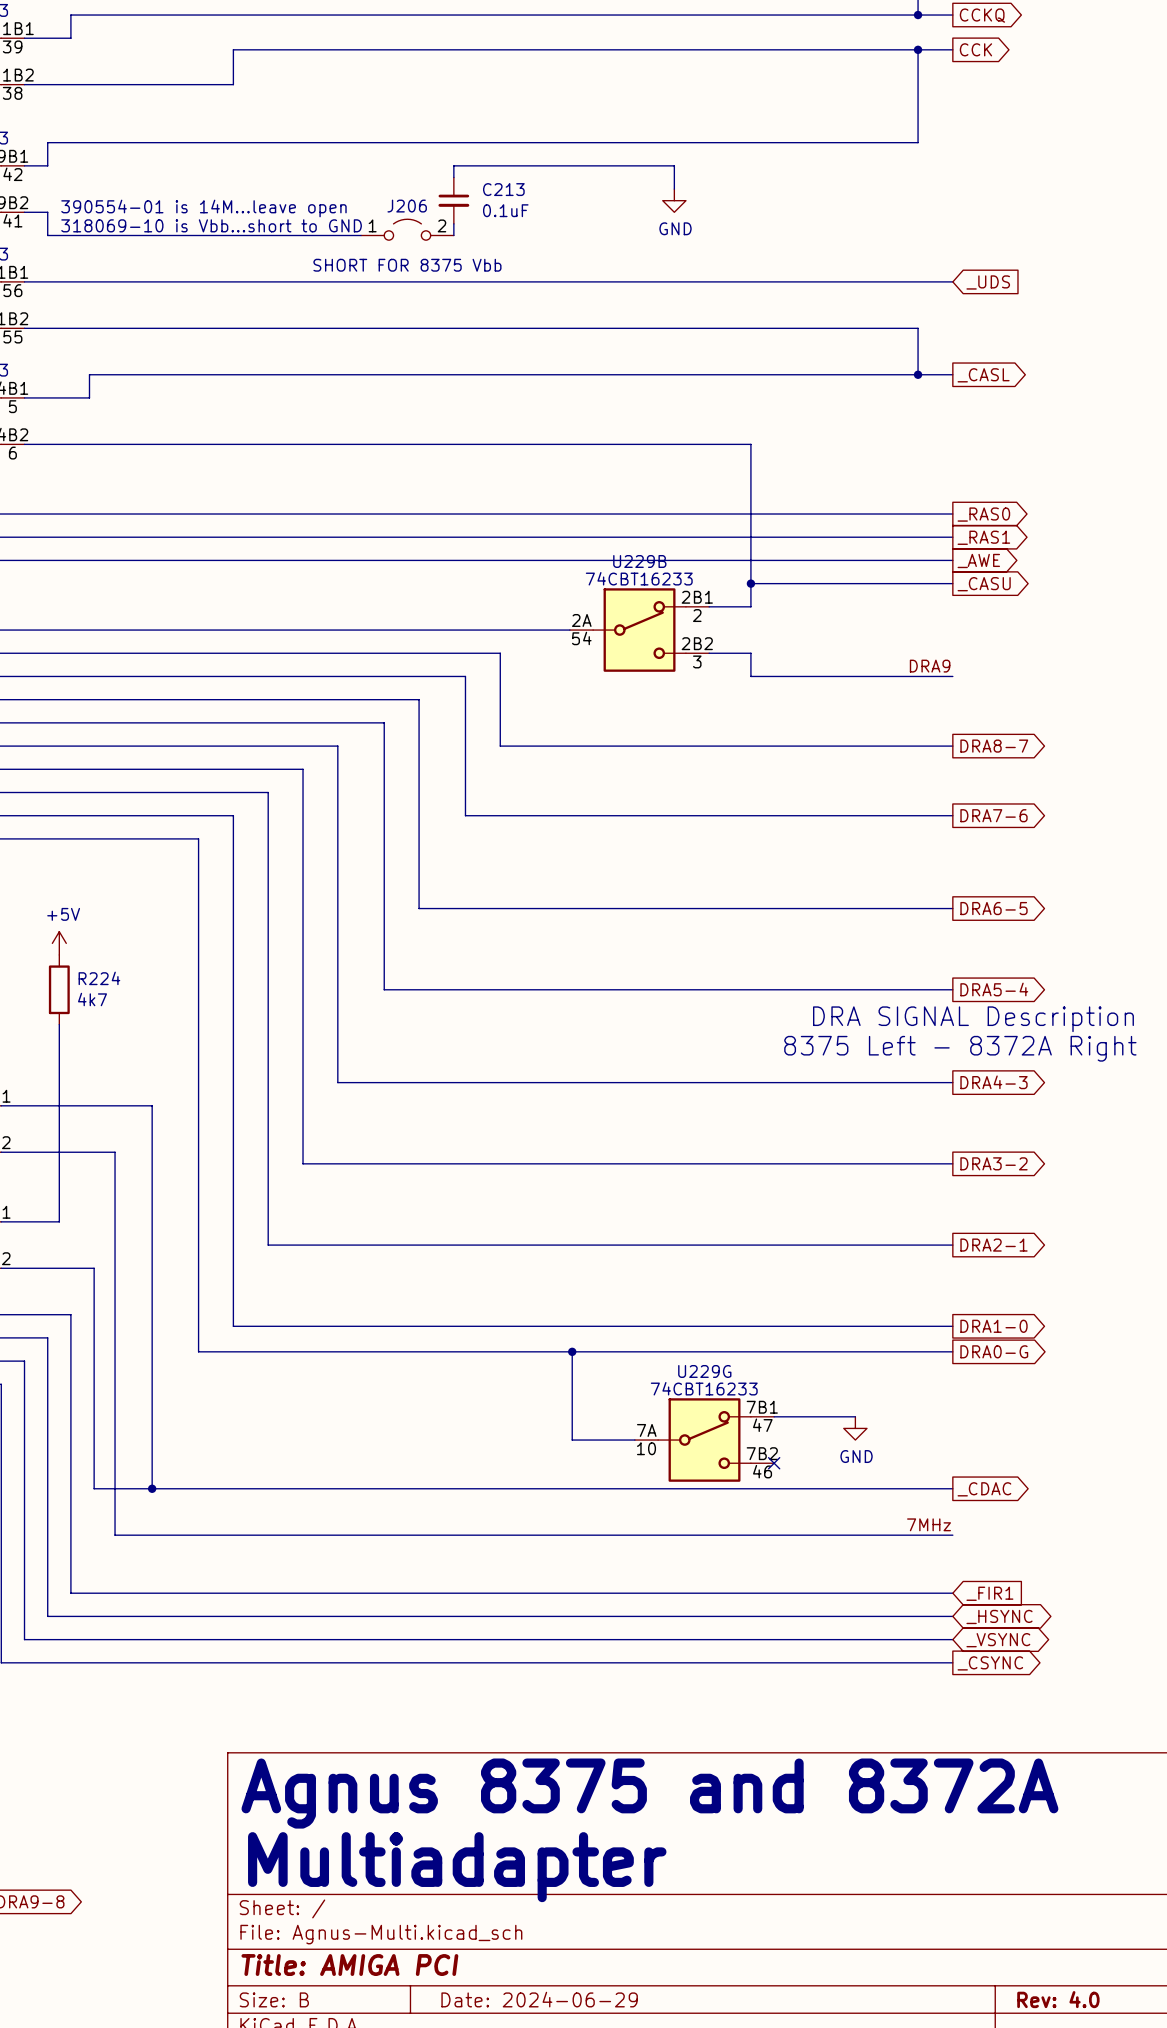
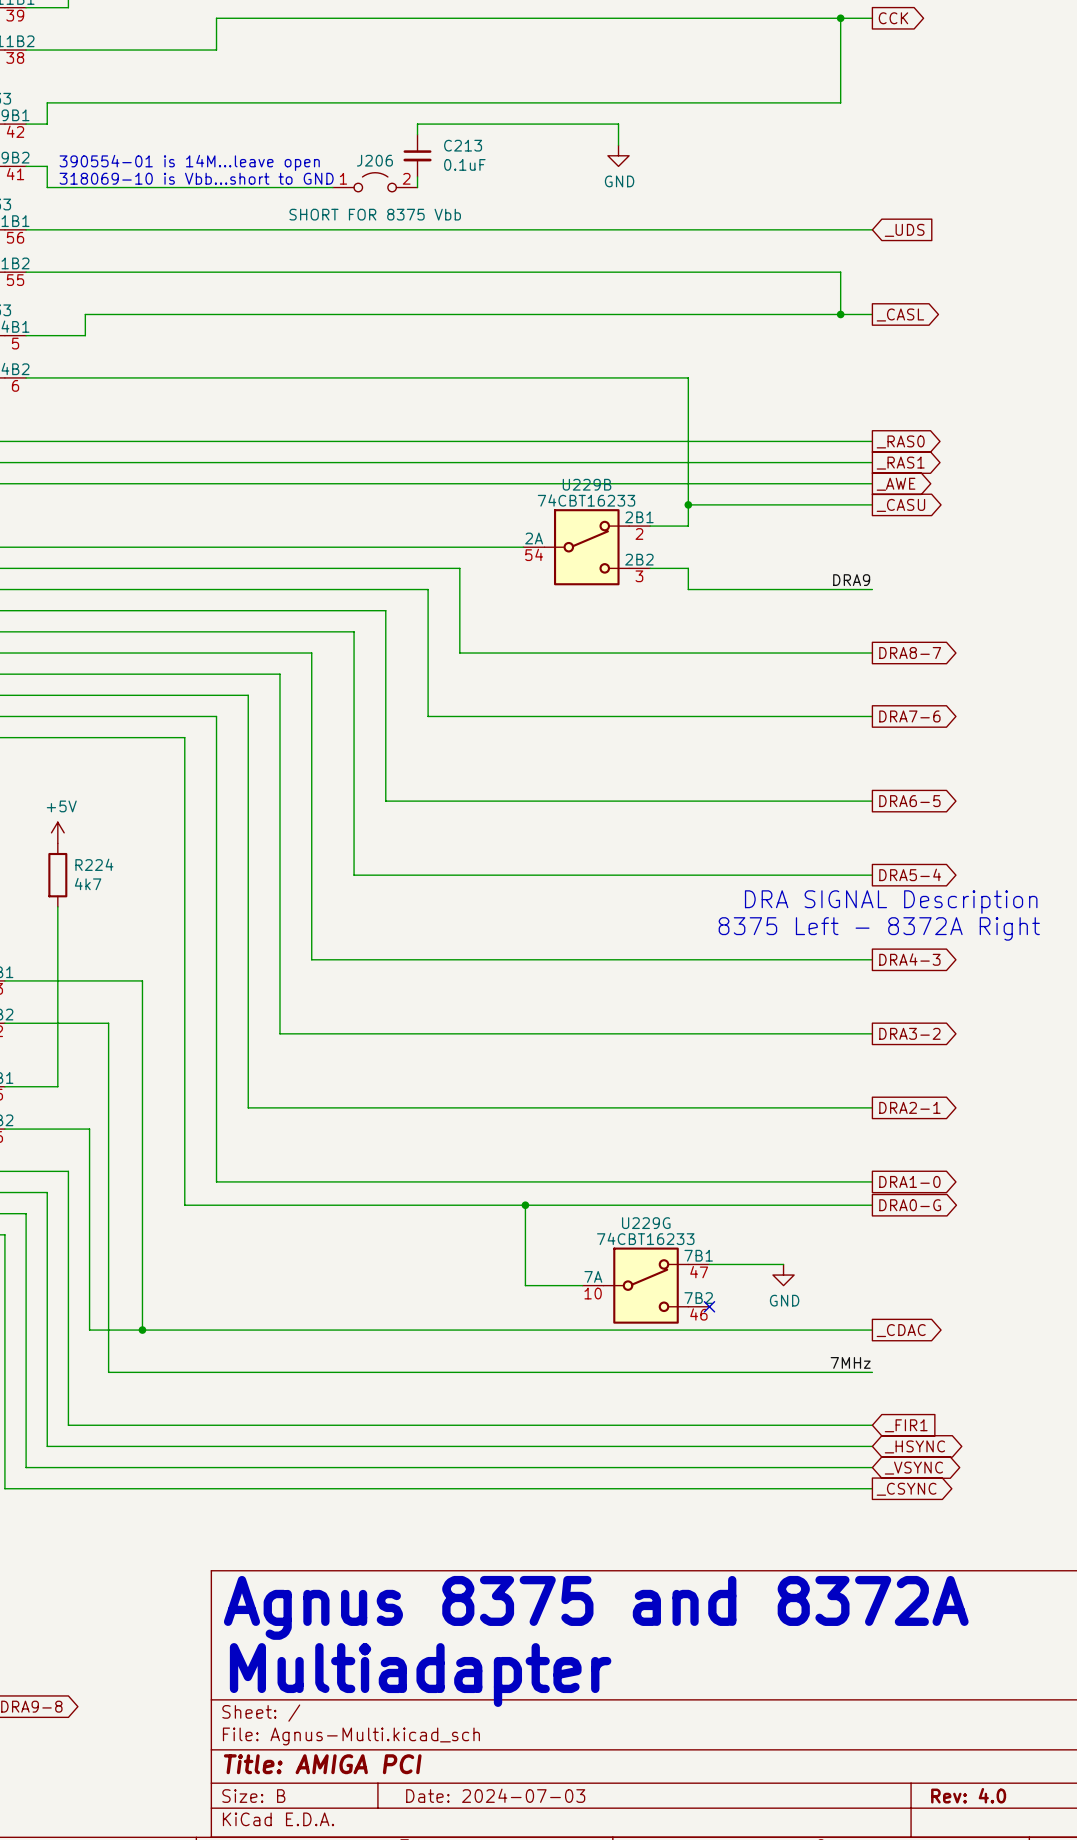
title block: Date: 2024-06-29 (539, 1999) -> Date: 2024-07-03 (495, 1795)

